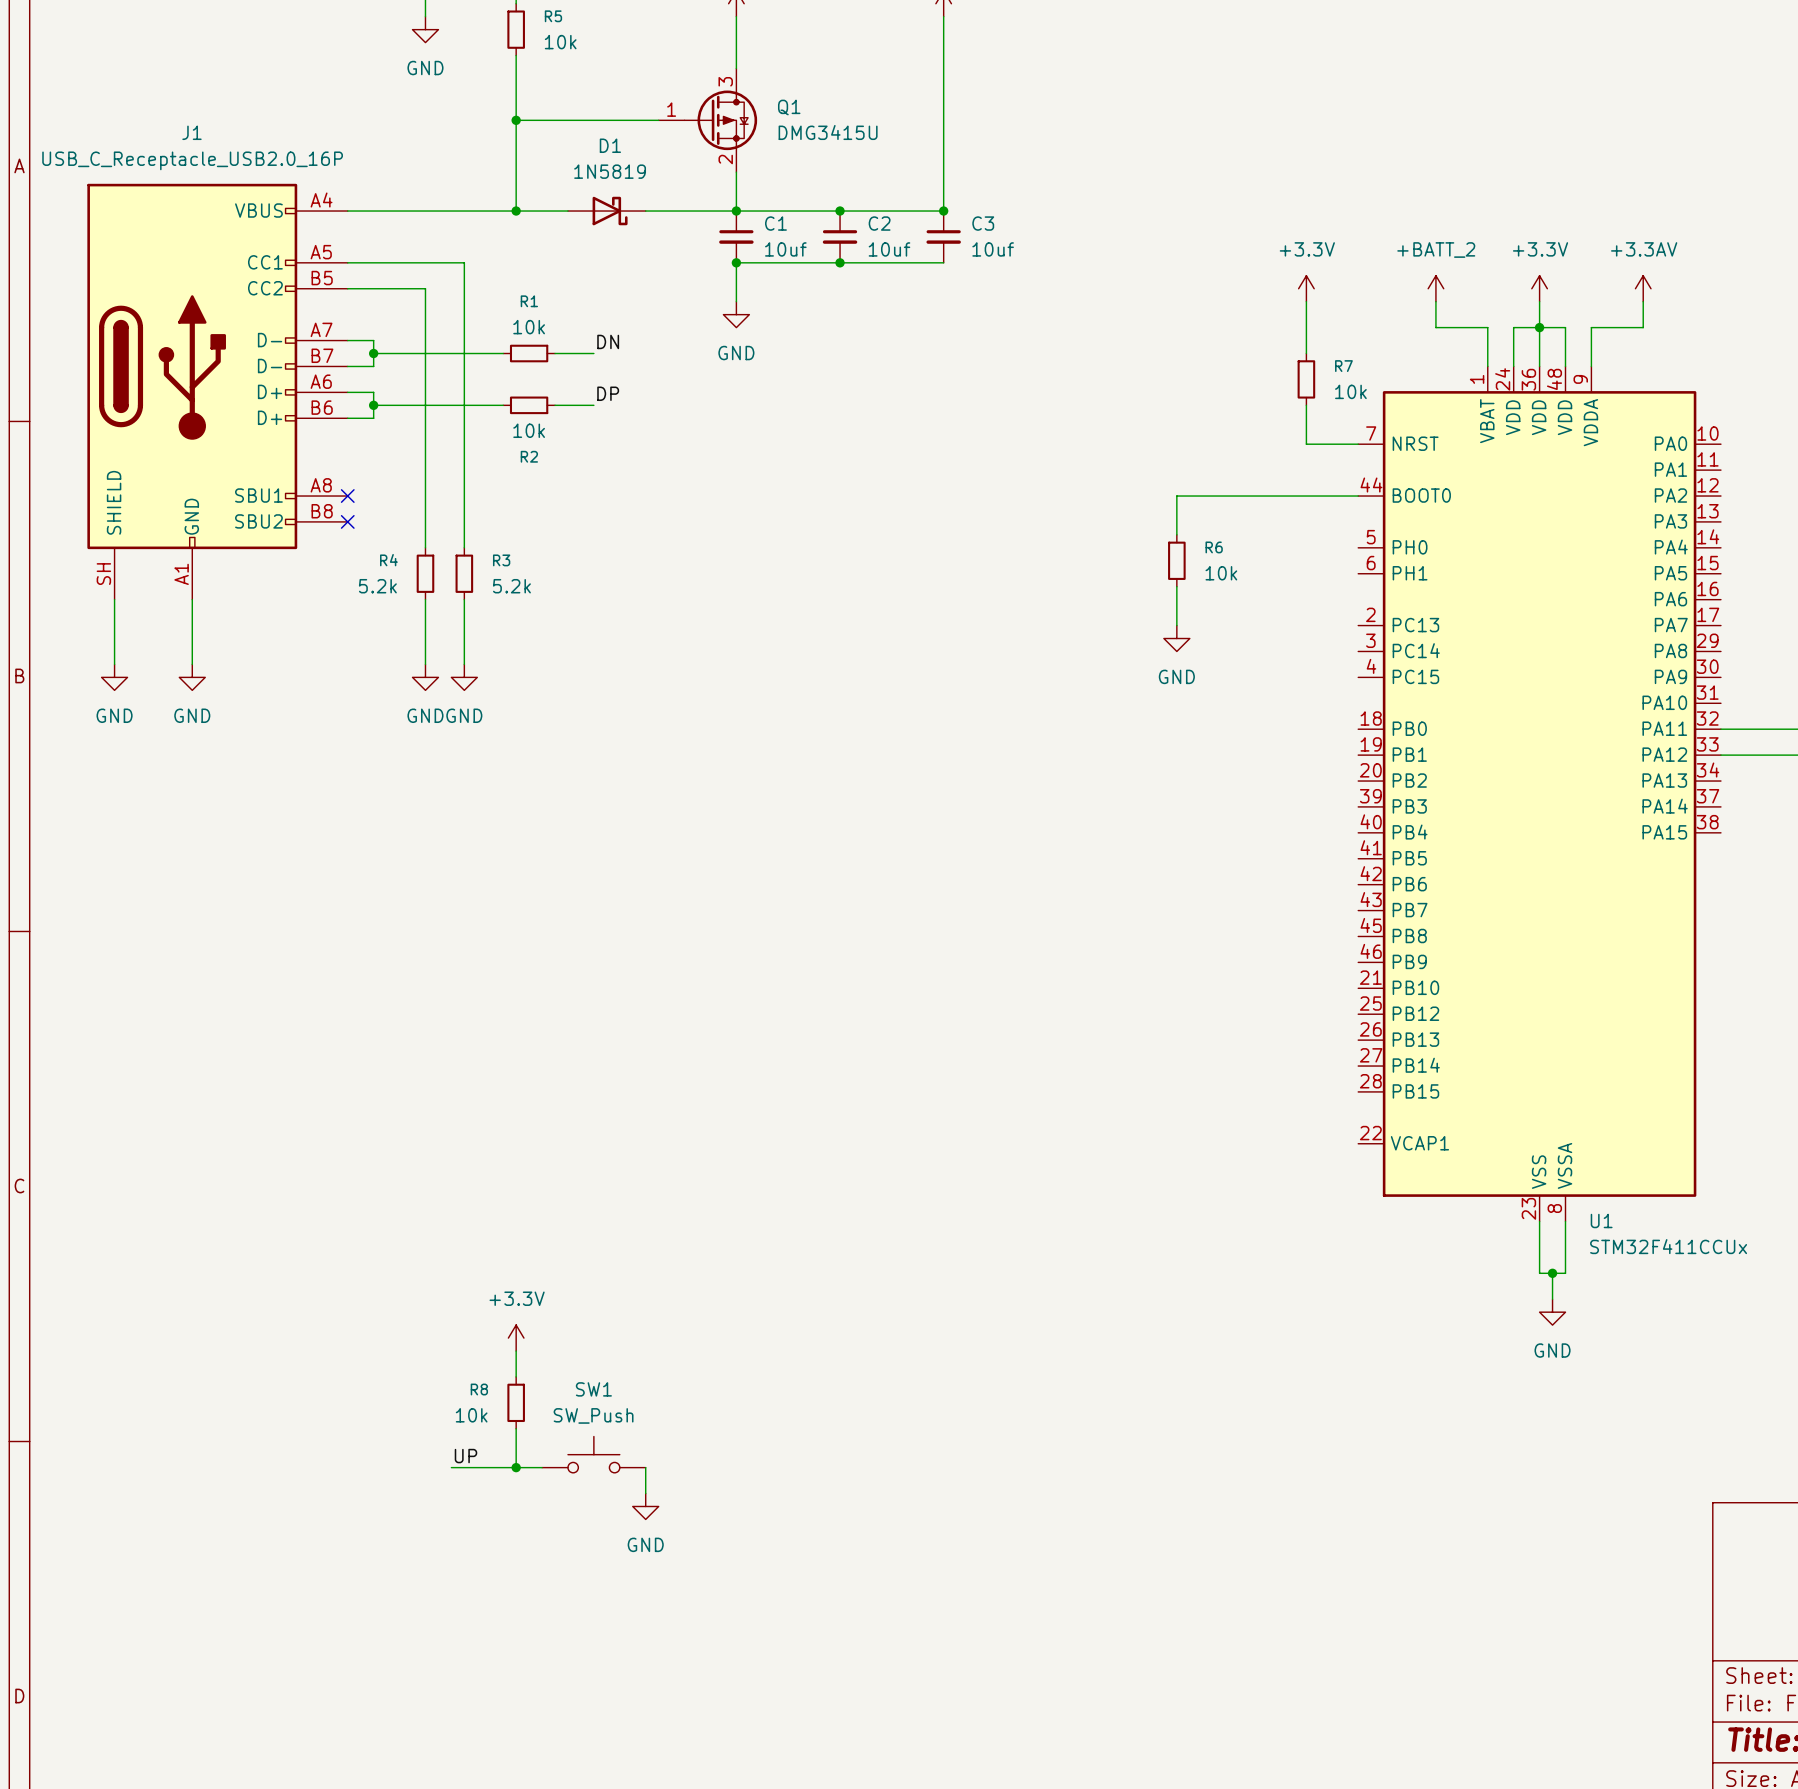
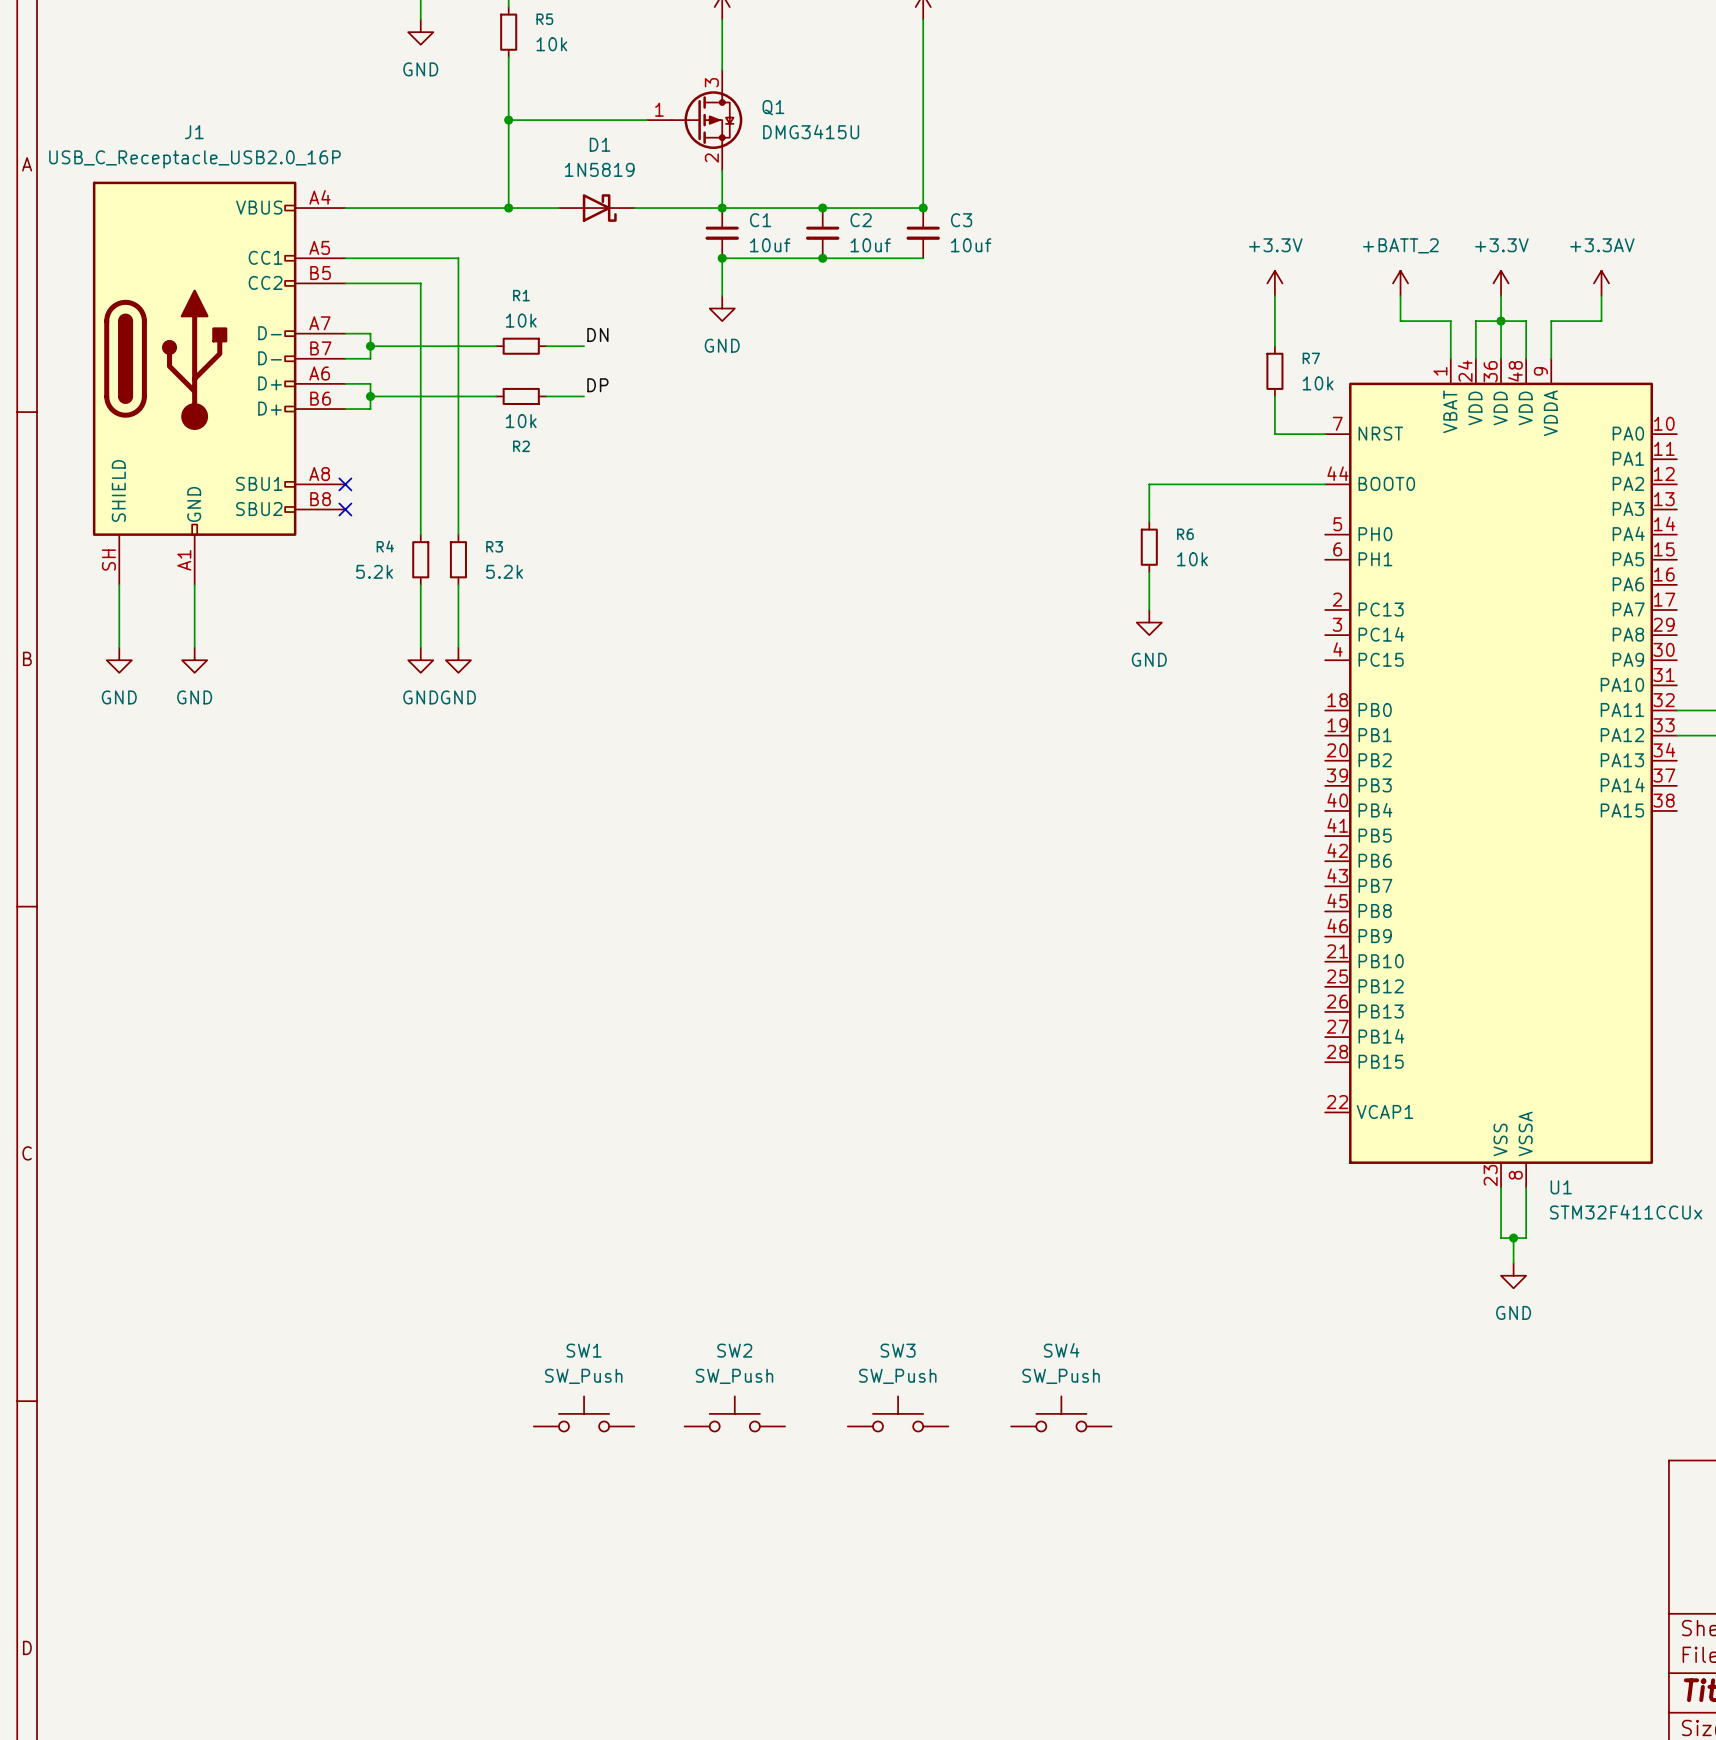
power symbol: +3.3V (516, 1338) -> none
wire: (516, 1351) (516, 1376) -> none
R8: 10k (516, 1402) -> none
wire: (516, 1428) (516, 1467) -> none
SW2: none -> SW_Push (734, 1413)
SW3: none -> SW_Push (898, 1413)
SW4: none -> SW_Push (1061, 1413)
label: UP (465, 1456) -> none
wire: (451, 1467) (542, 1467) -> none
junction: (516, 1467) -> none
wire: (645, 1467) (645, 1493) -> none
power symbol: GND (645, 1506) -> none

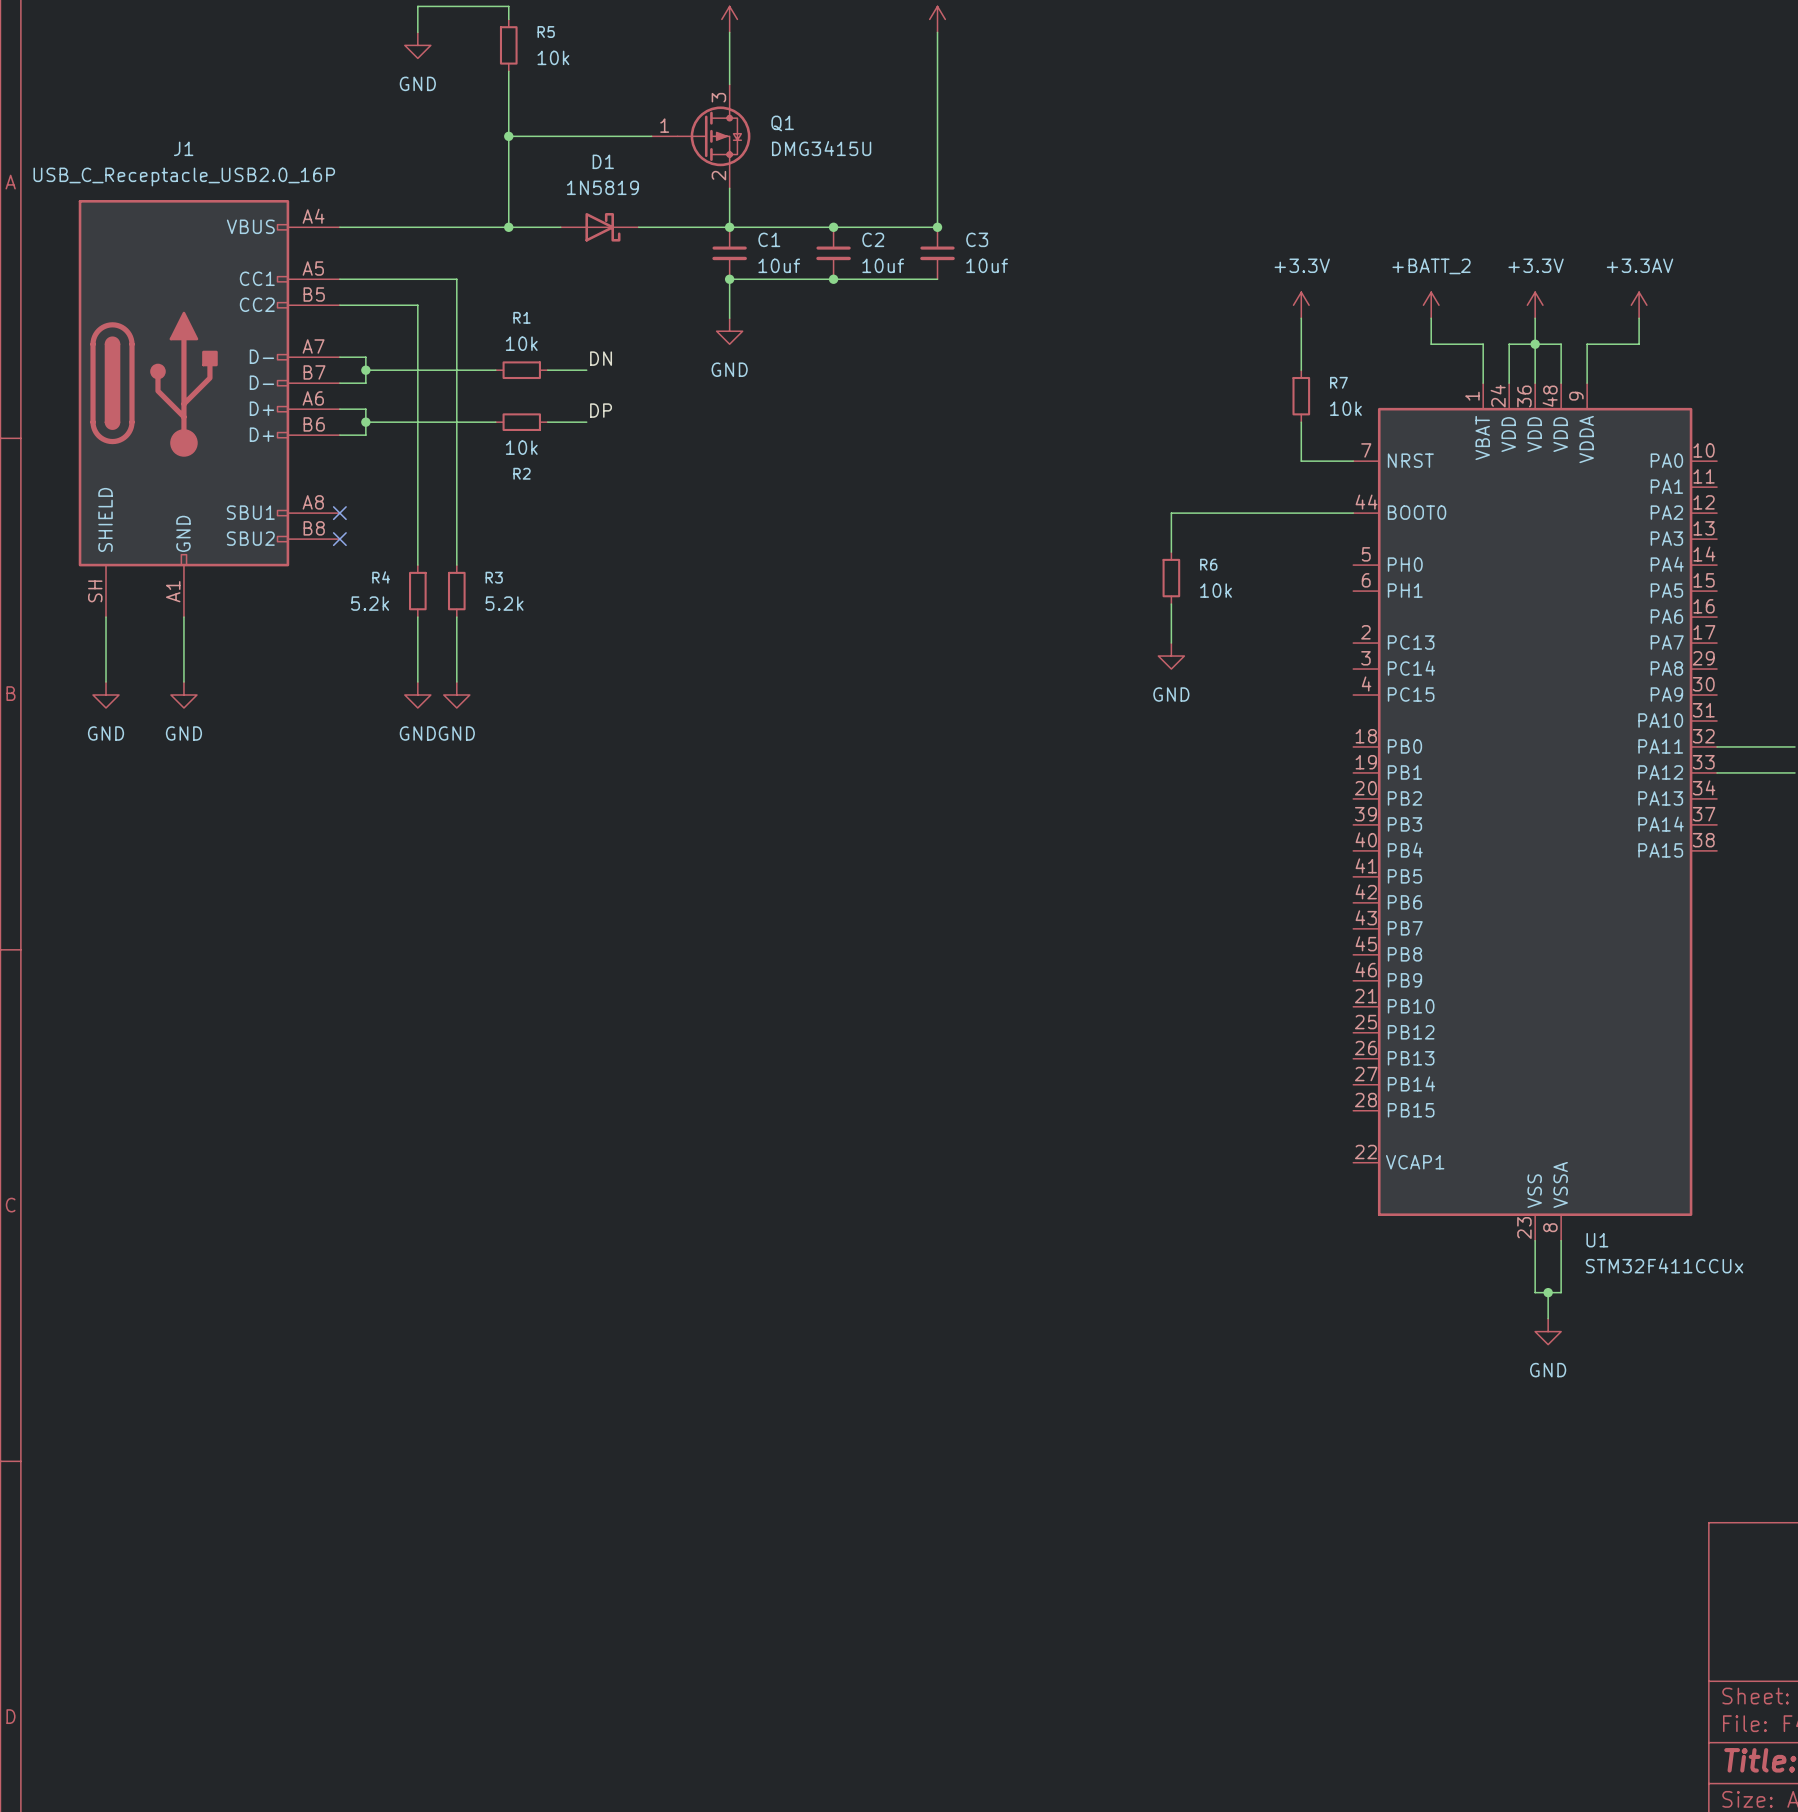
SW1: SW_Push (584, 1413) -> none
SW2: SW_Push (734, 1413) -> none
SW3: SW_Push (898, 1413) -> none
SW4: SW_Push (1061, 1413) -> none

